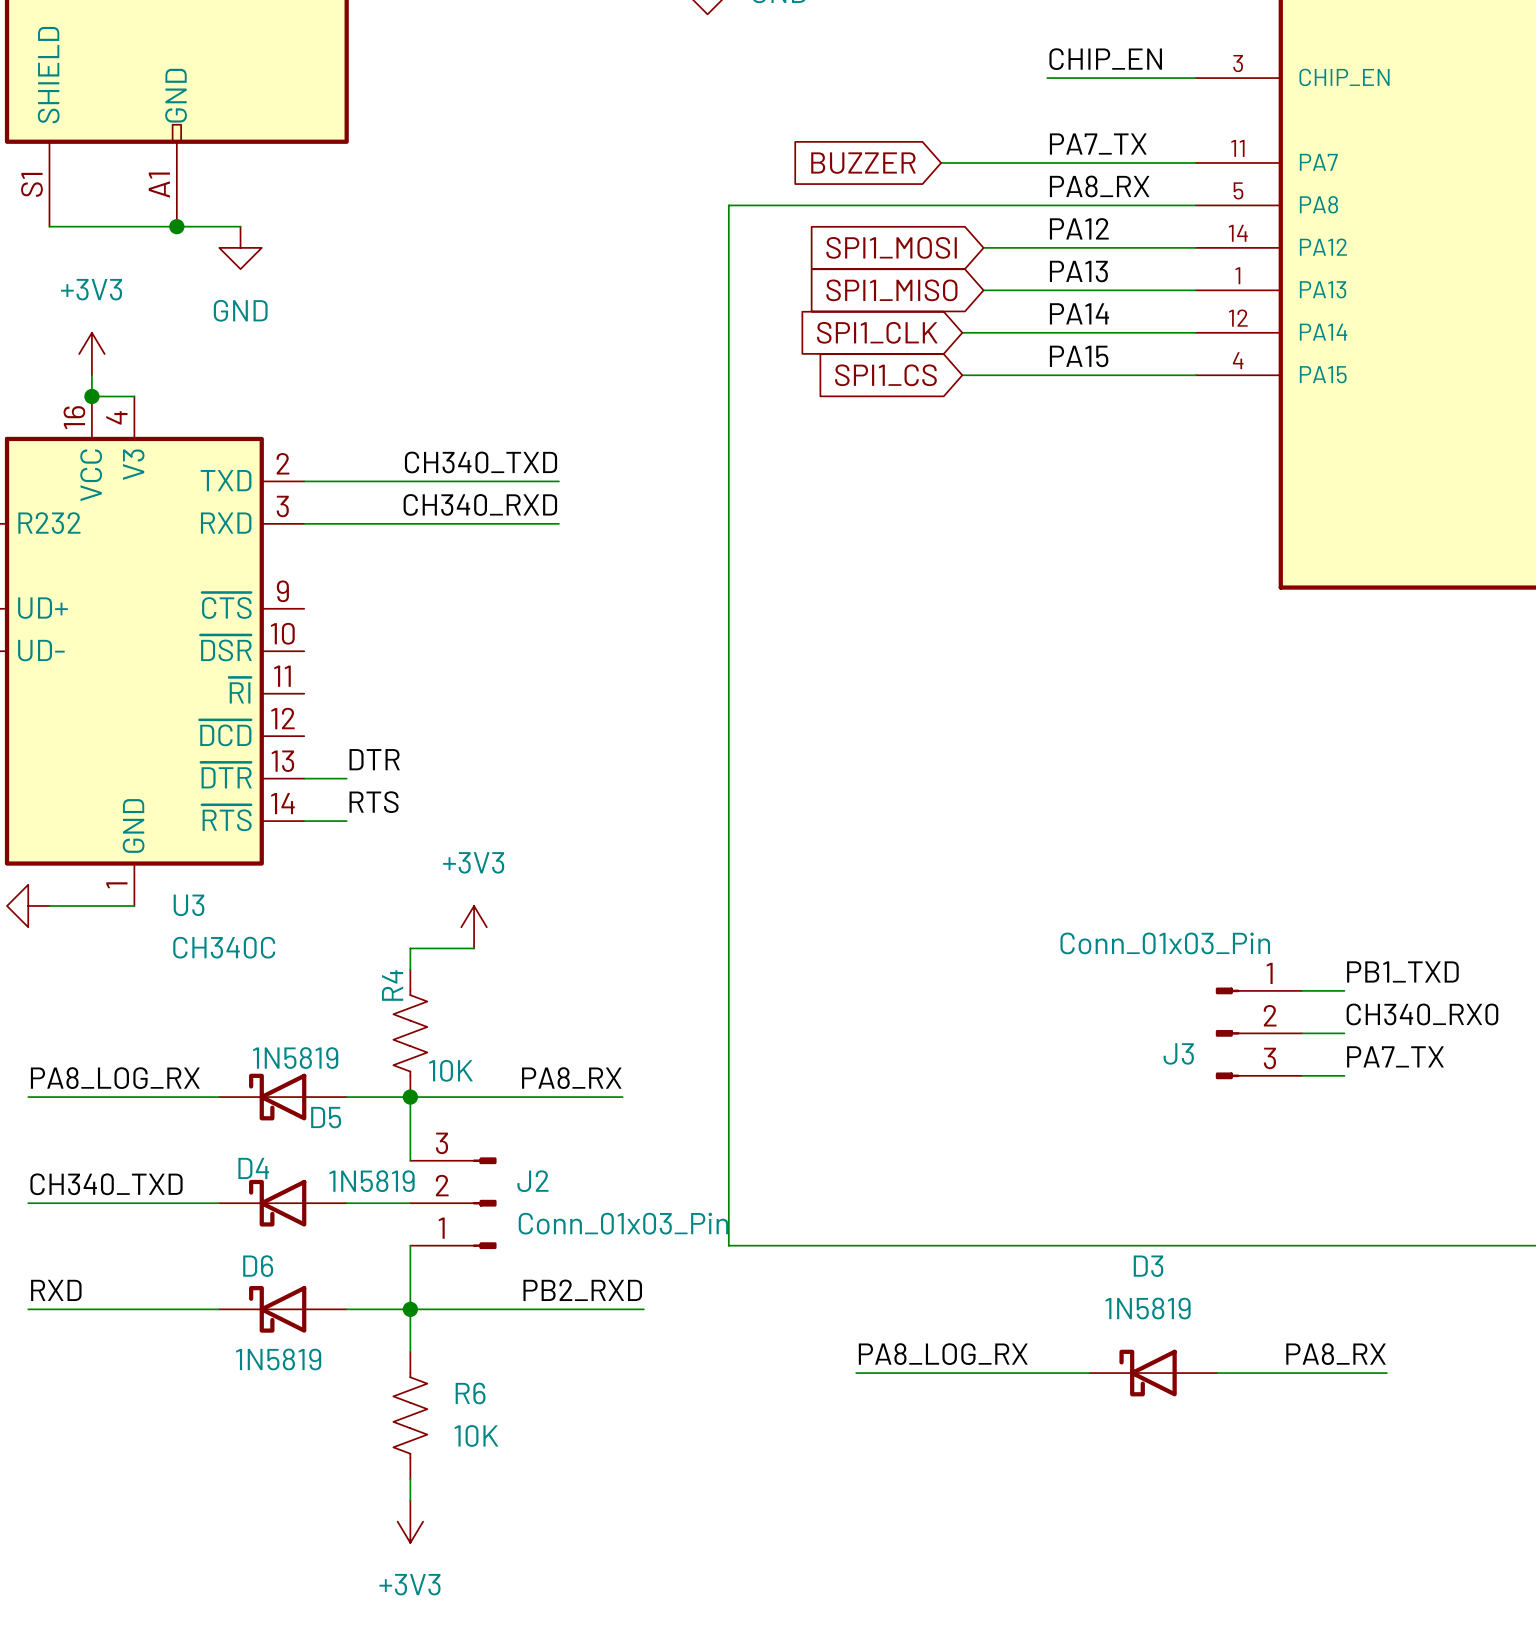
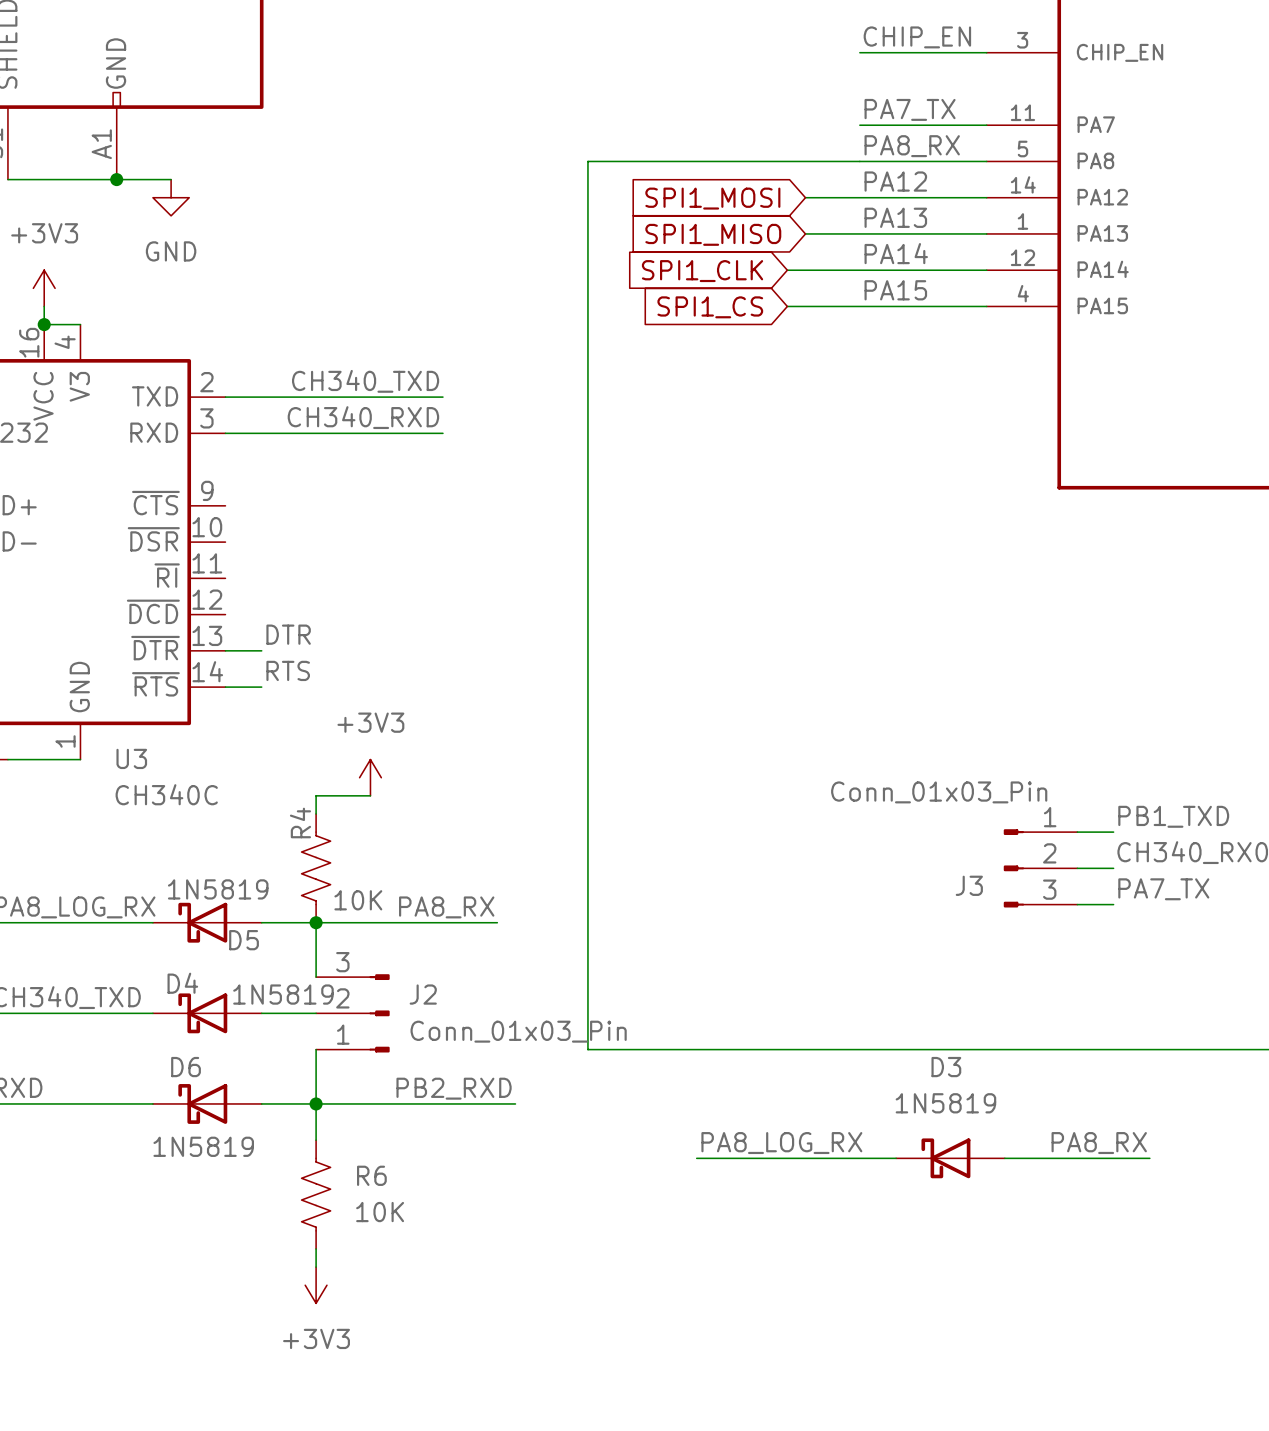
wire: (941, 162) (1047, 162) -> none
global label: BUZZER (863, 163) -> none

